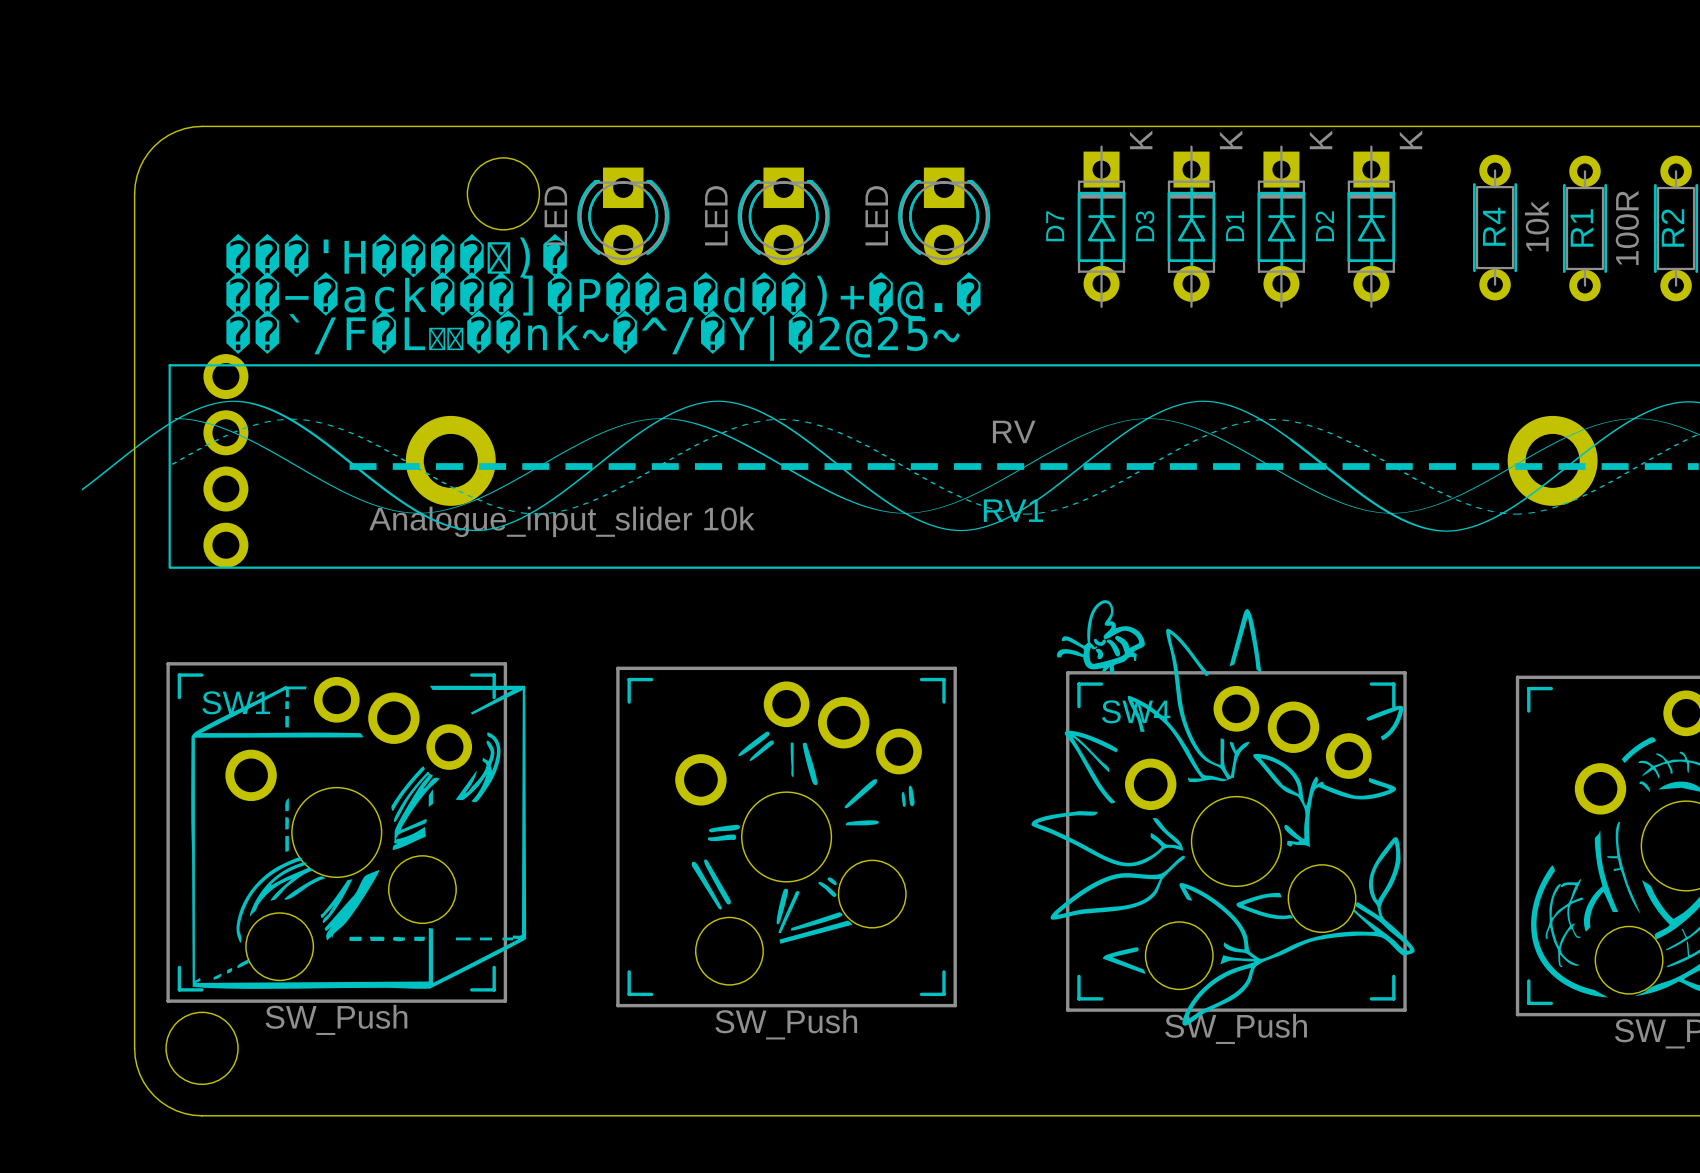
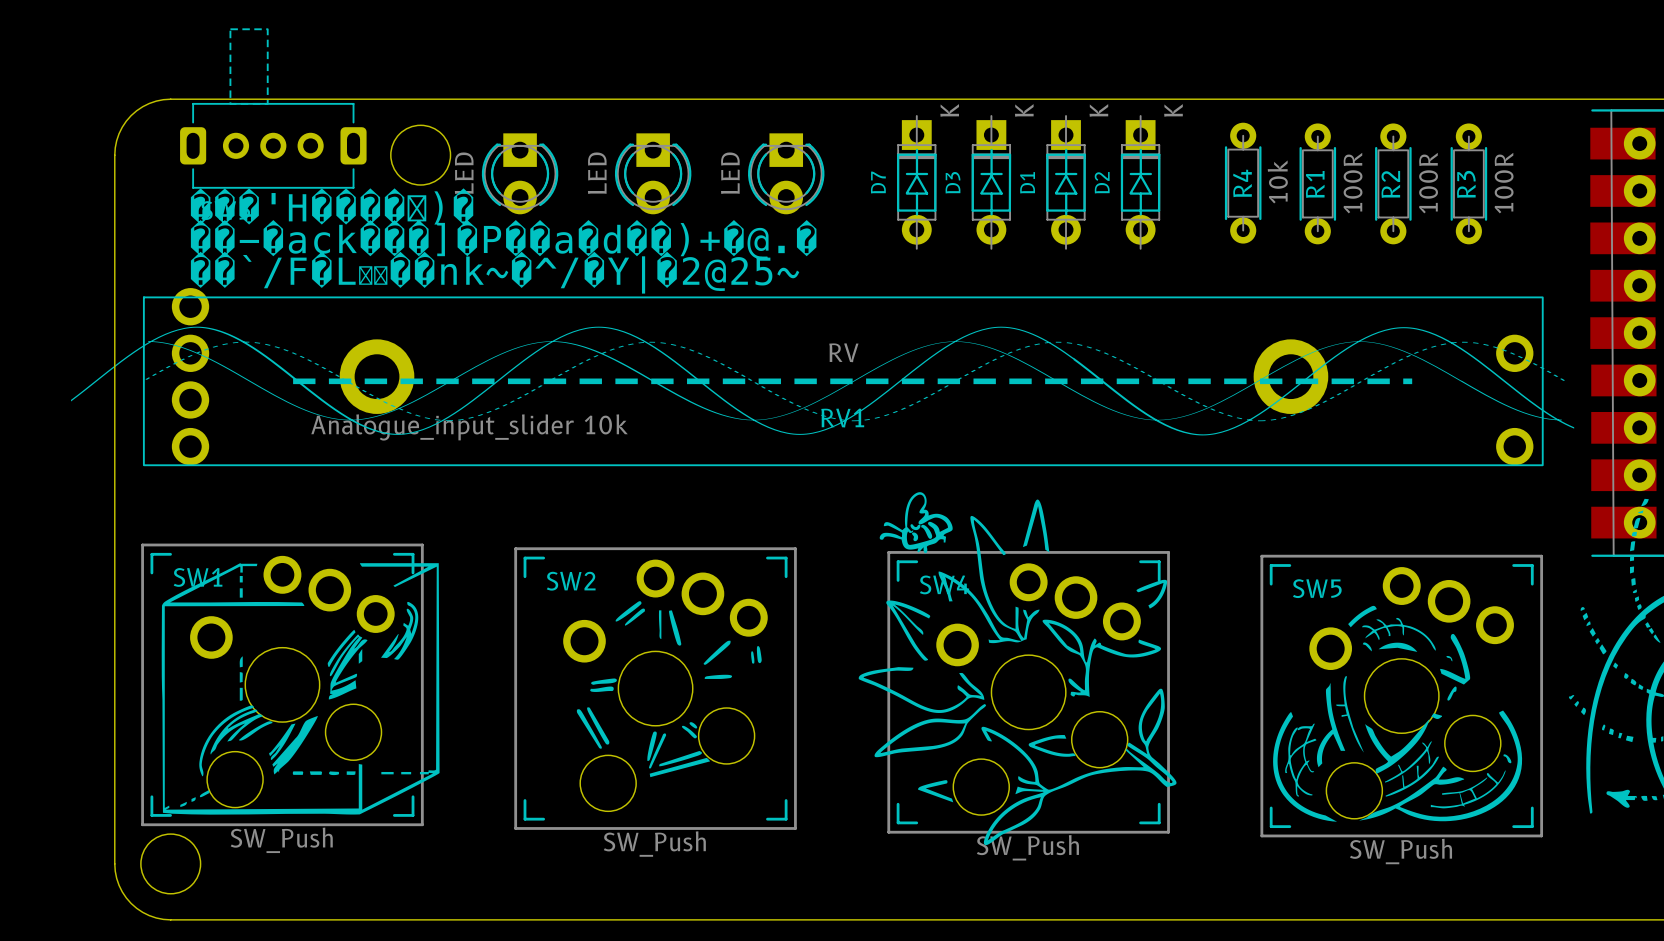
part: none -> (273, 108)
SW2 name: none -> SW2 (571, 581)
SW5 name: none -> SW5 (1317, 588)

